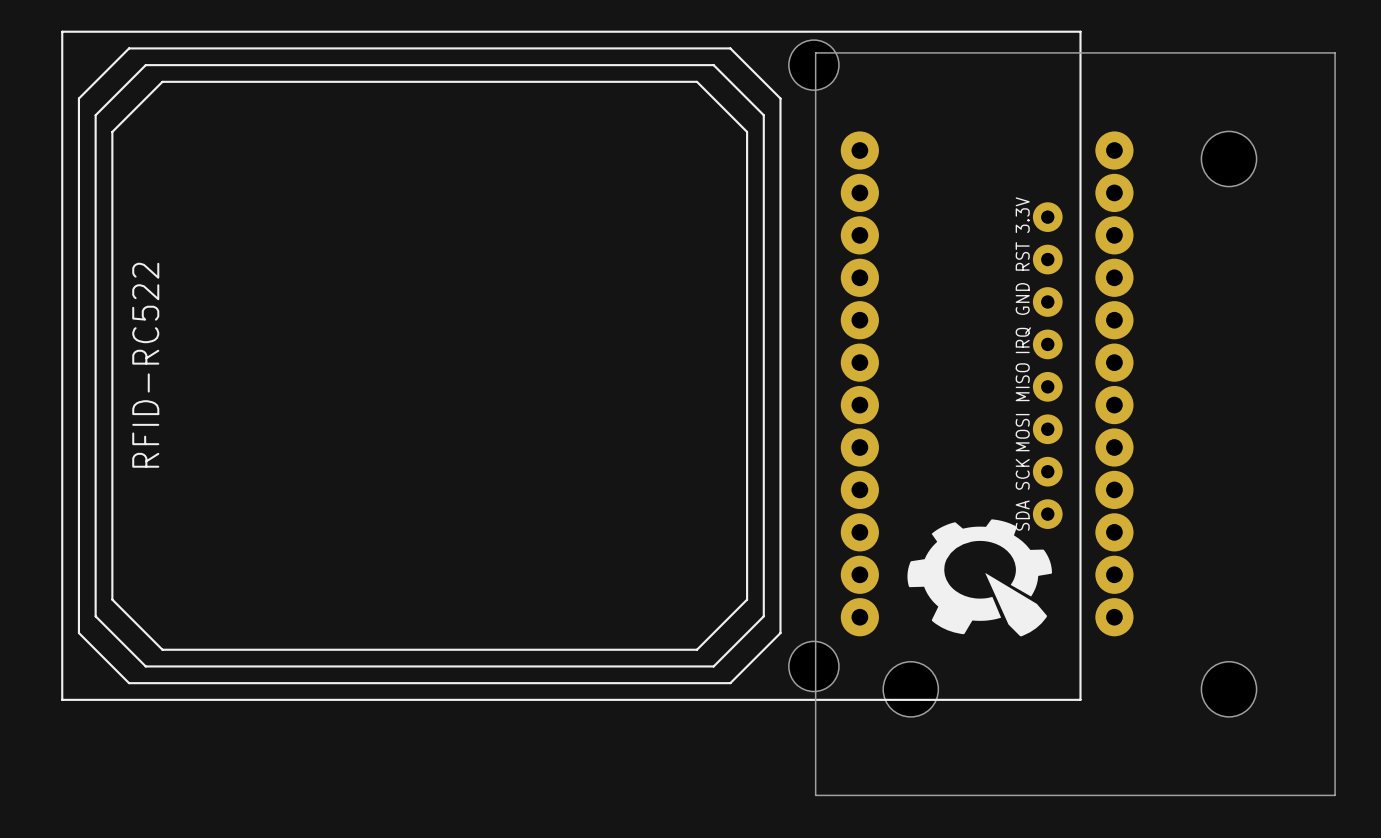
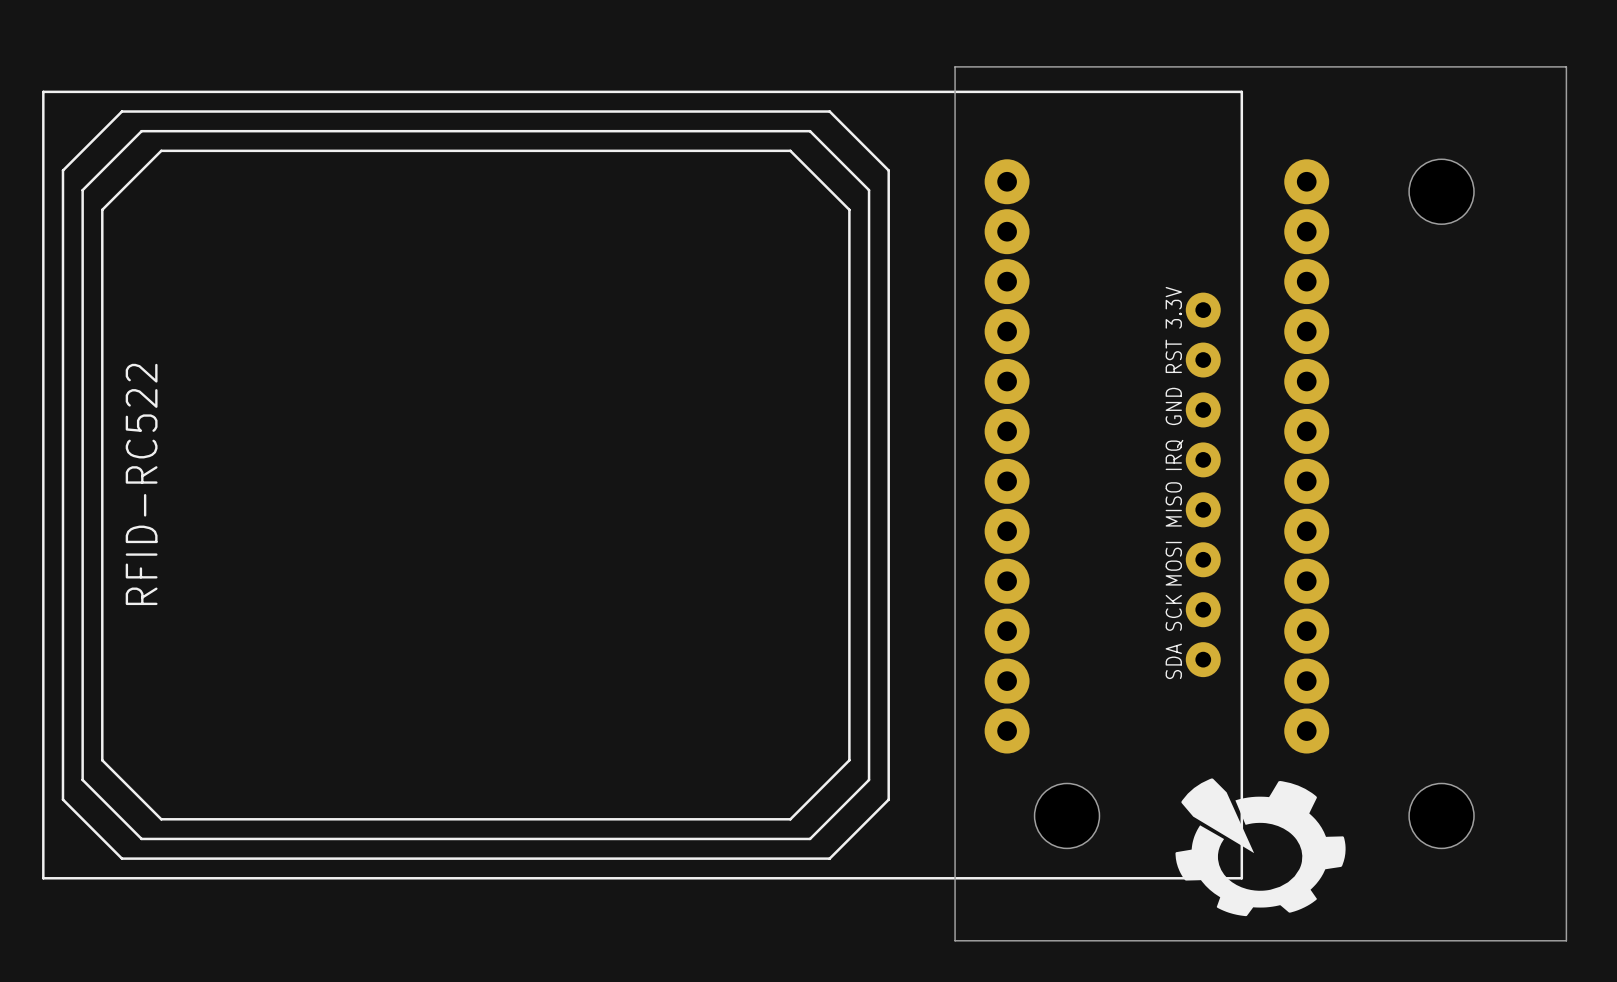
part: (571, 365) -> none
part: none -> (642, 485)
drawing: [907, 519, 1052, 637] -> none
drawing: none -> [1175, 778, 1346, 917]

